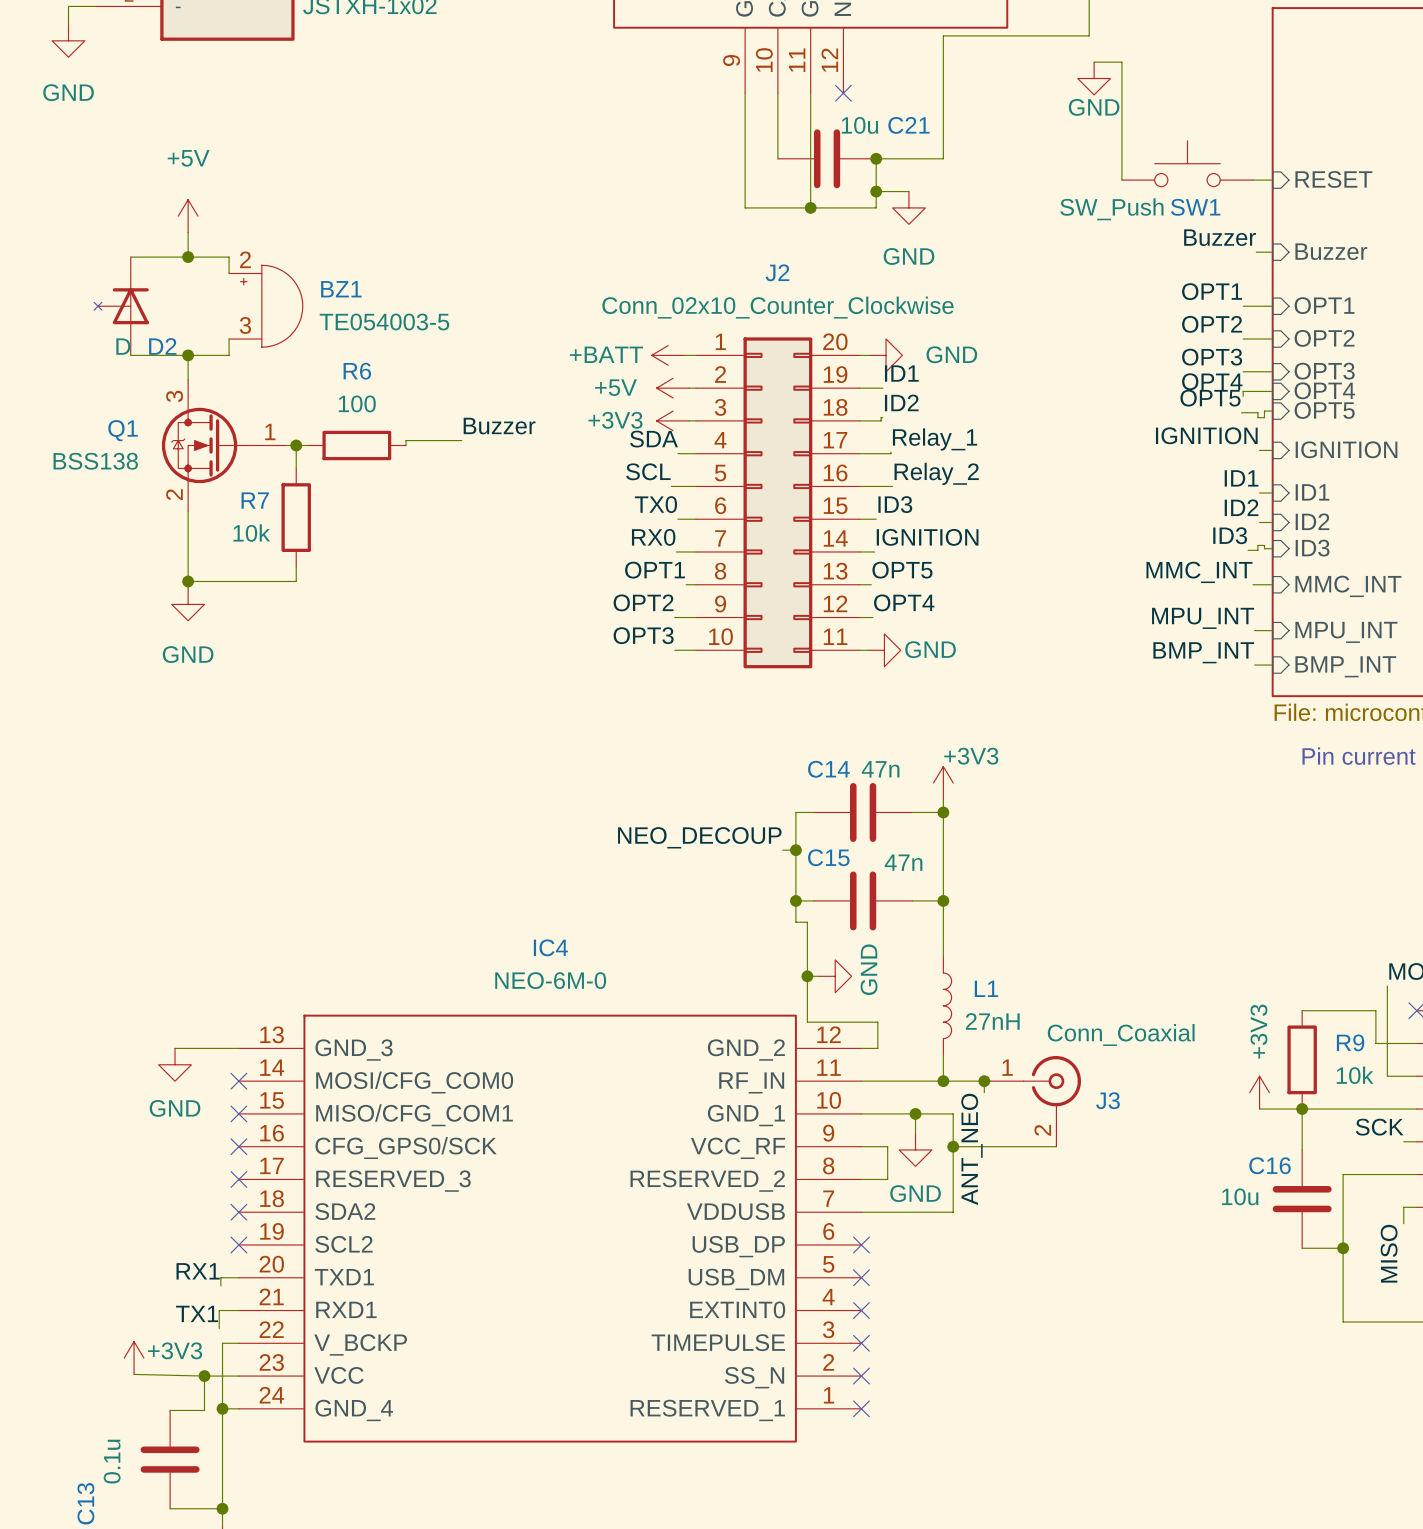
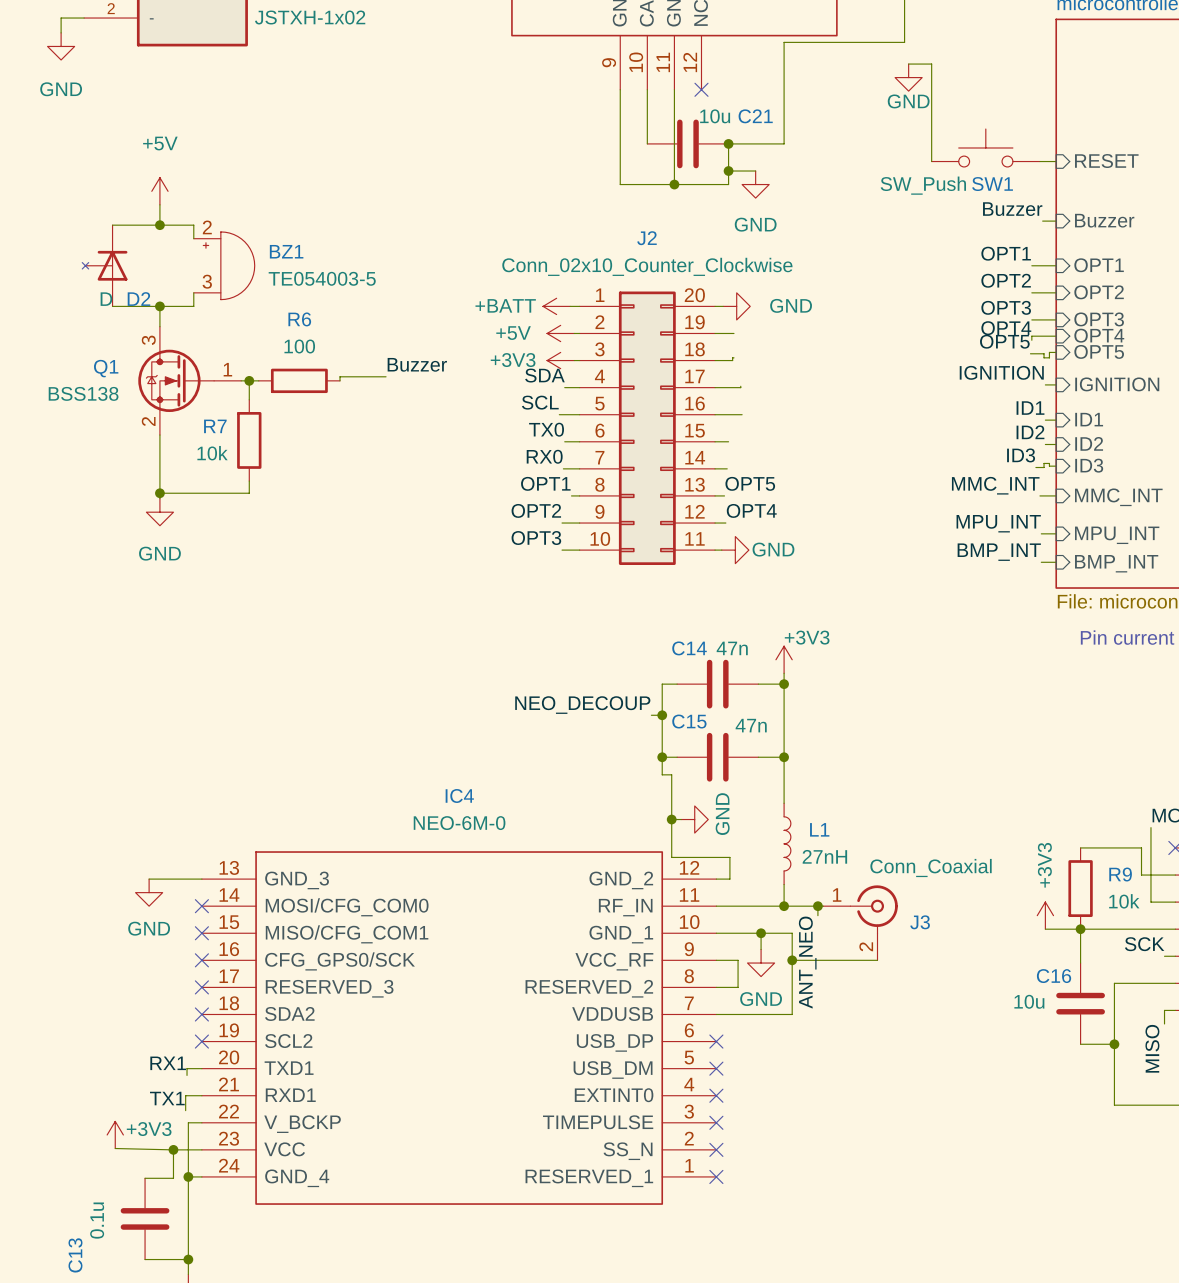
label: ID1 (901, 373) -> none
label: ID2 (901, 402) -> none
label: Relay_1 (935, 439) -> none
label: Relay_2 (936, 473) -> none
label: ID3 (895, 504) -> none
label: IGNITION (927, 537) -> none

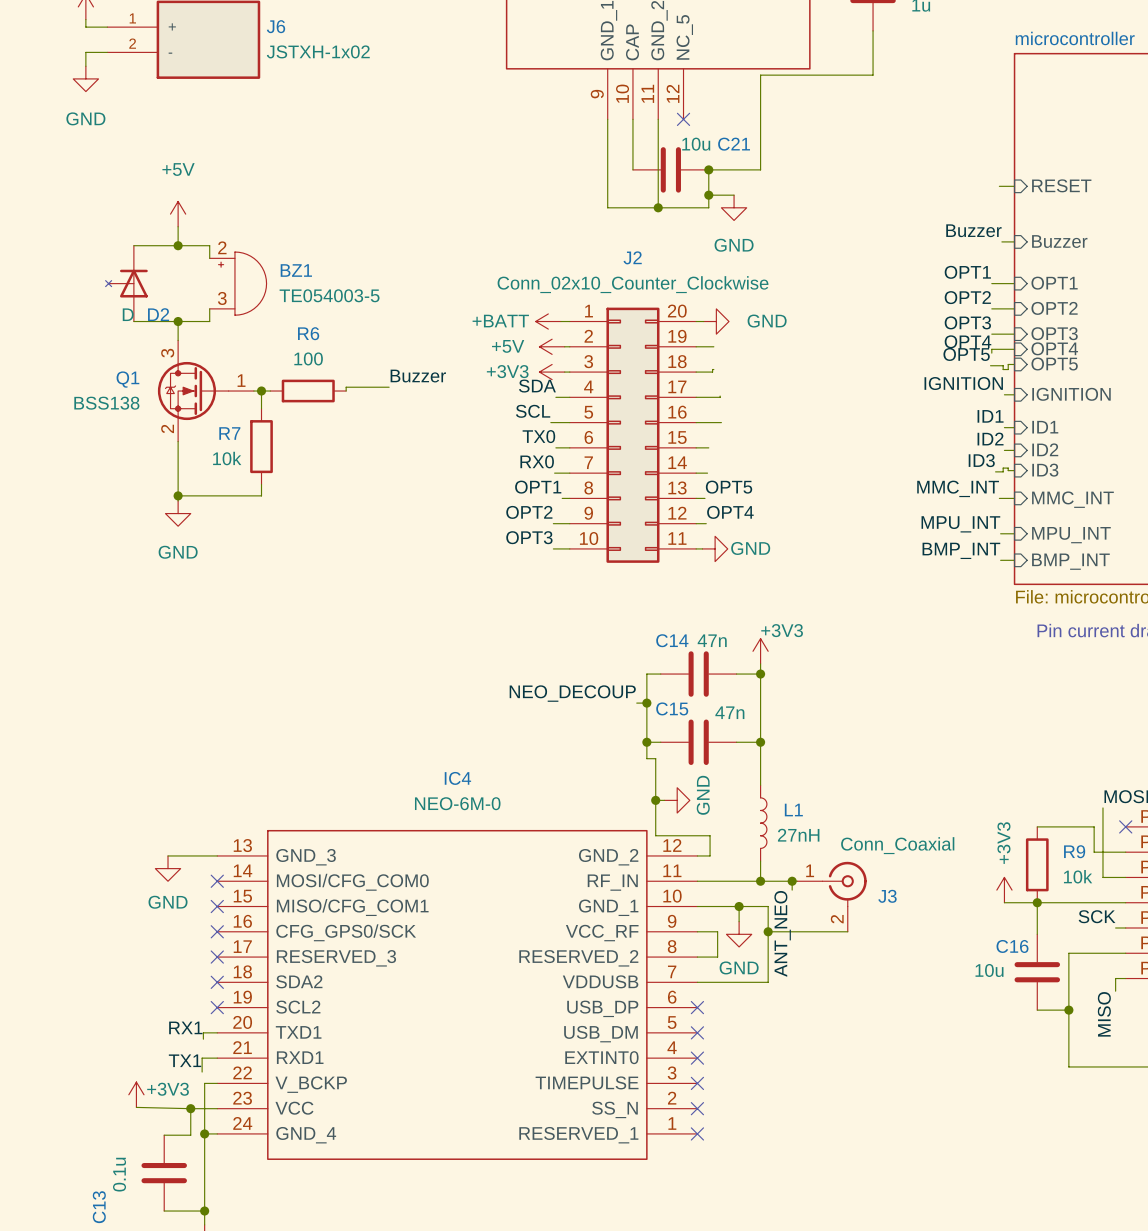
wire: (908, 64) (931, 64) (931, 161) -> none
power symbol: GND (908, 77) -> none
SW1: SW_Push (985, 147) -> none

